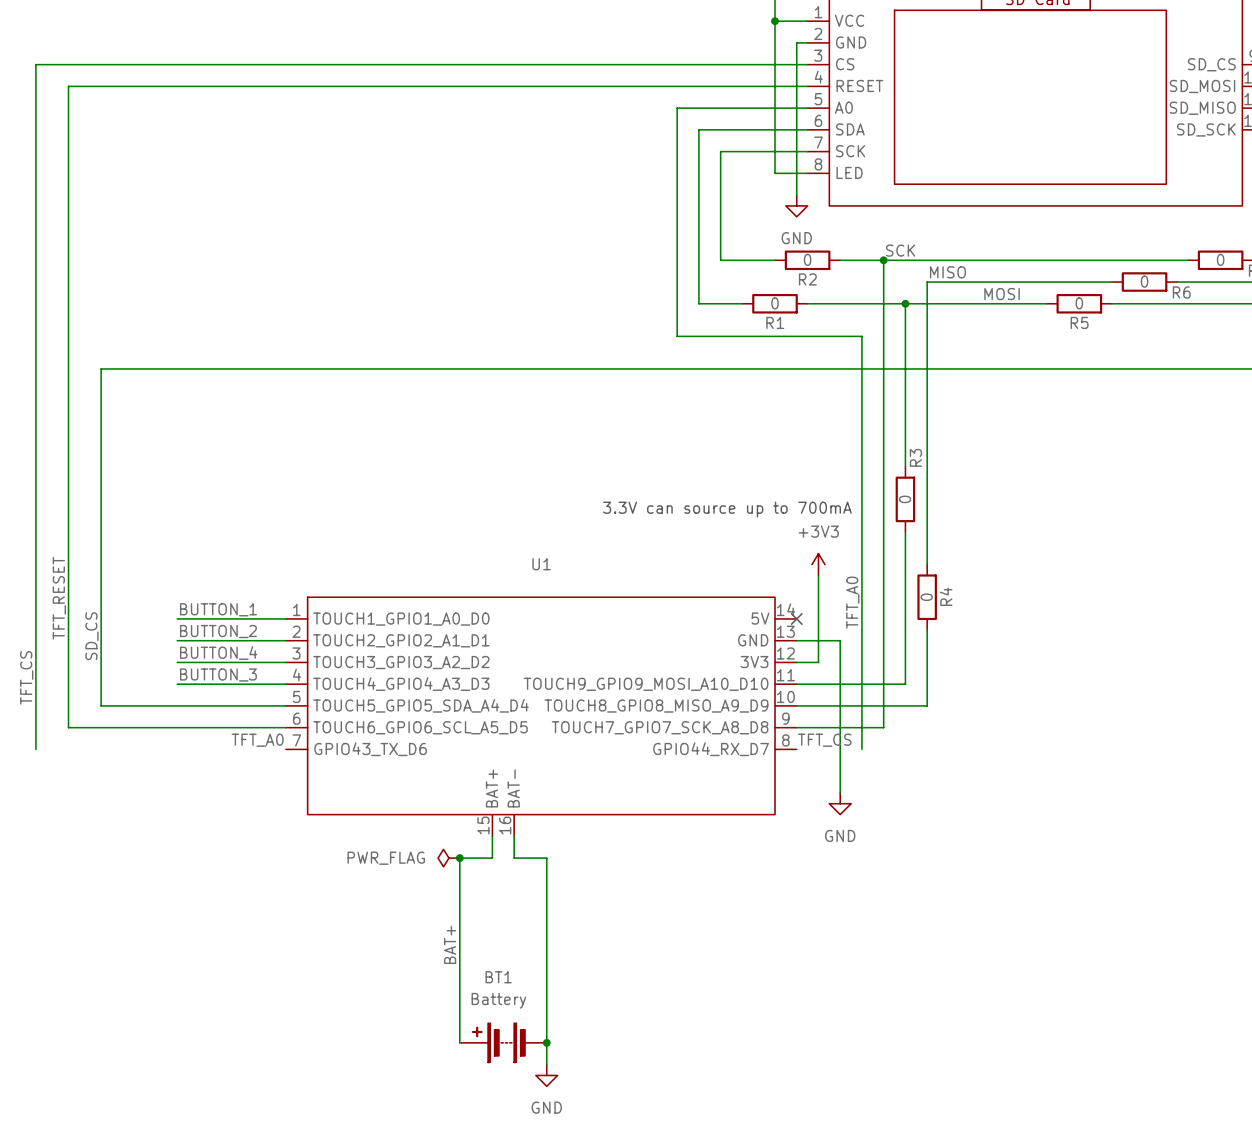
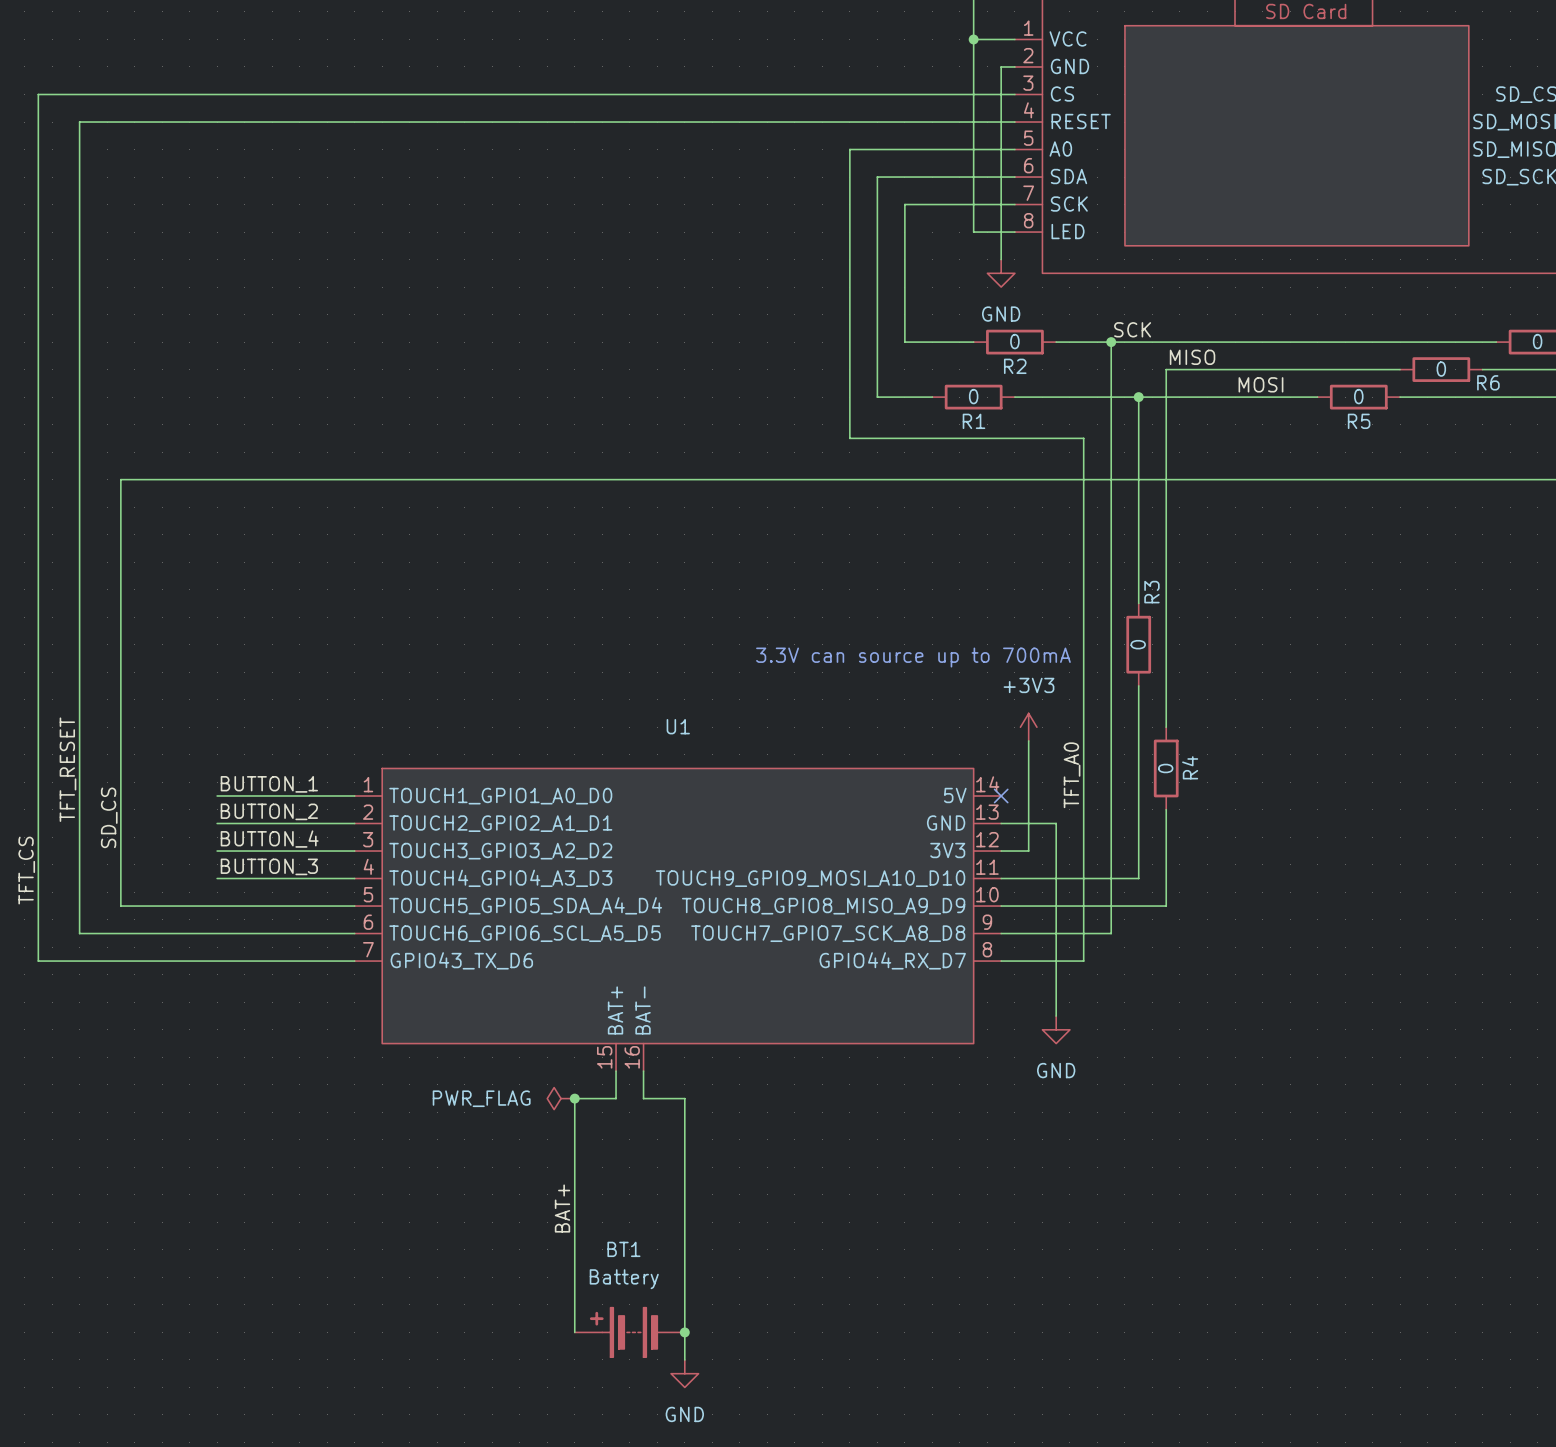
label: TFT_A0 (257, 740) -> none
label: TFT_CS (824, 740) -> none
wire: none -> (38, 961) (354, 961)
wire: none -> (1001, 961) (1083, 961)

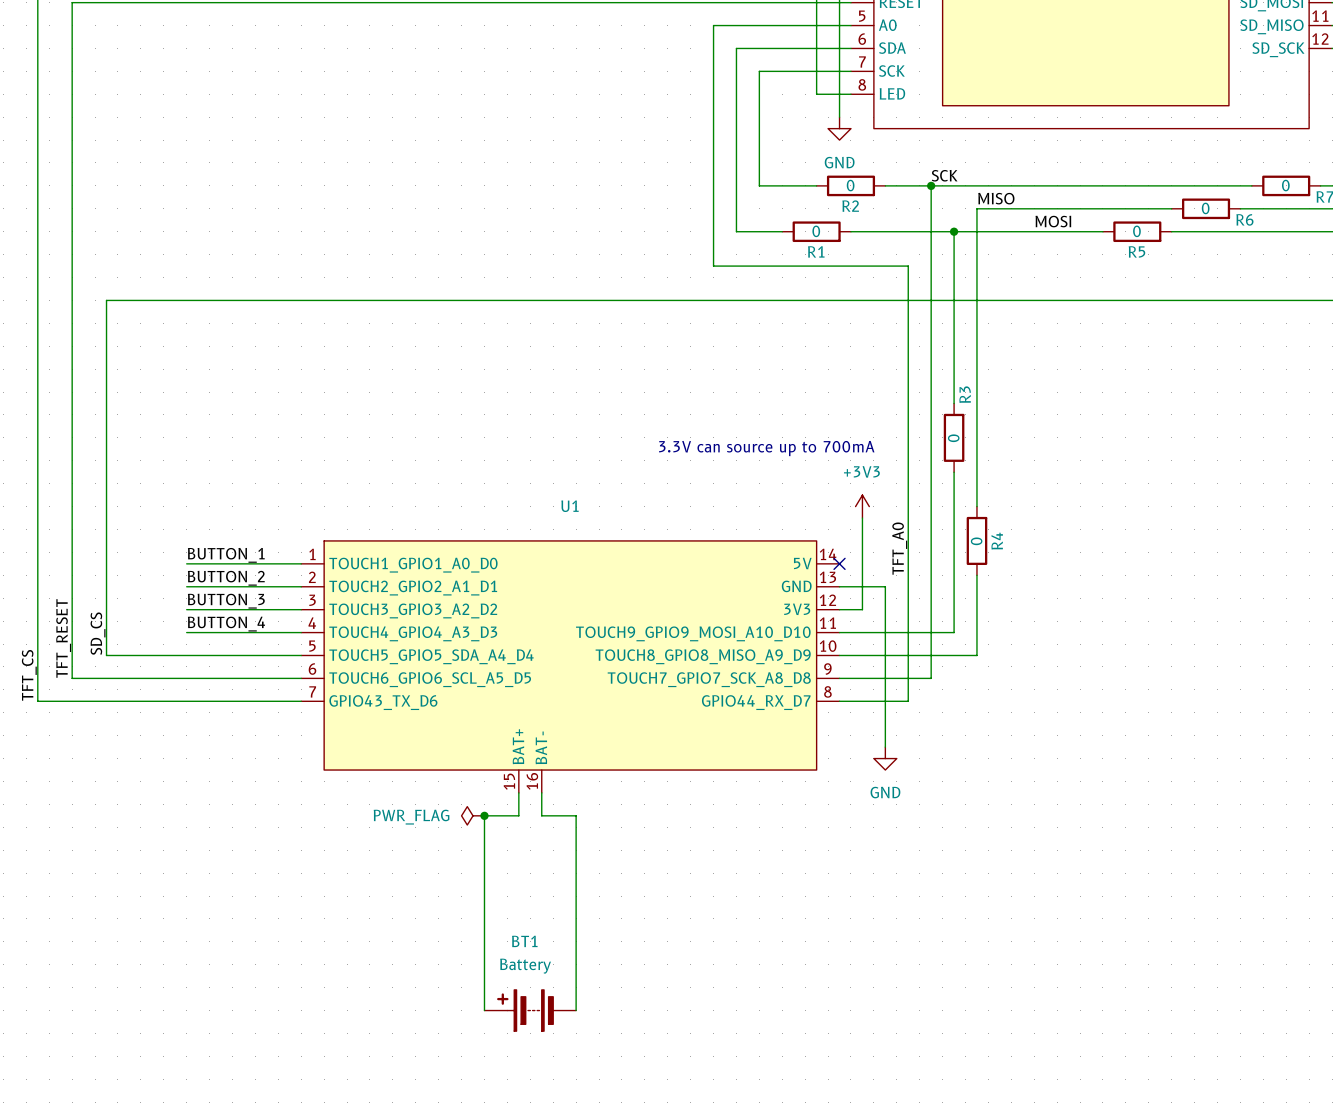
label position: TFT_RESET (67, 769) -> TFT_RESET (63, 638)
label position: SD_CS (109, 817) -> SD_CS (98, 633)
label: BUTTON_4 (269, 839) -> BUTTON_3 (226, 601)
label: BUTTON_3 (269, 866) -> BUTTON_4 (226, 624)
label position: TFT_CS (26, 870) -> TFT_CS (29, 675)
label: BAT+ (562, 1208) -> none
wire: (684, 1332) (684, 1359) -> none
junction: (684, 1332) -> none
power symbol: GND (684, 1373) -> none

